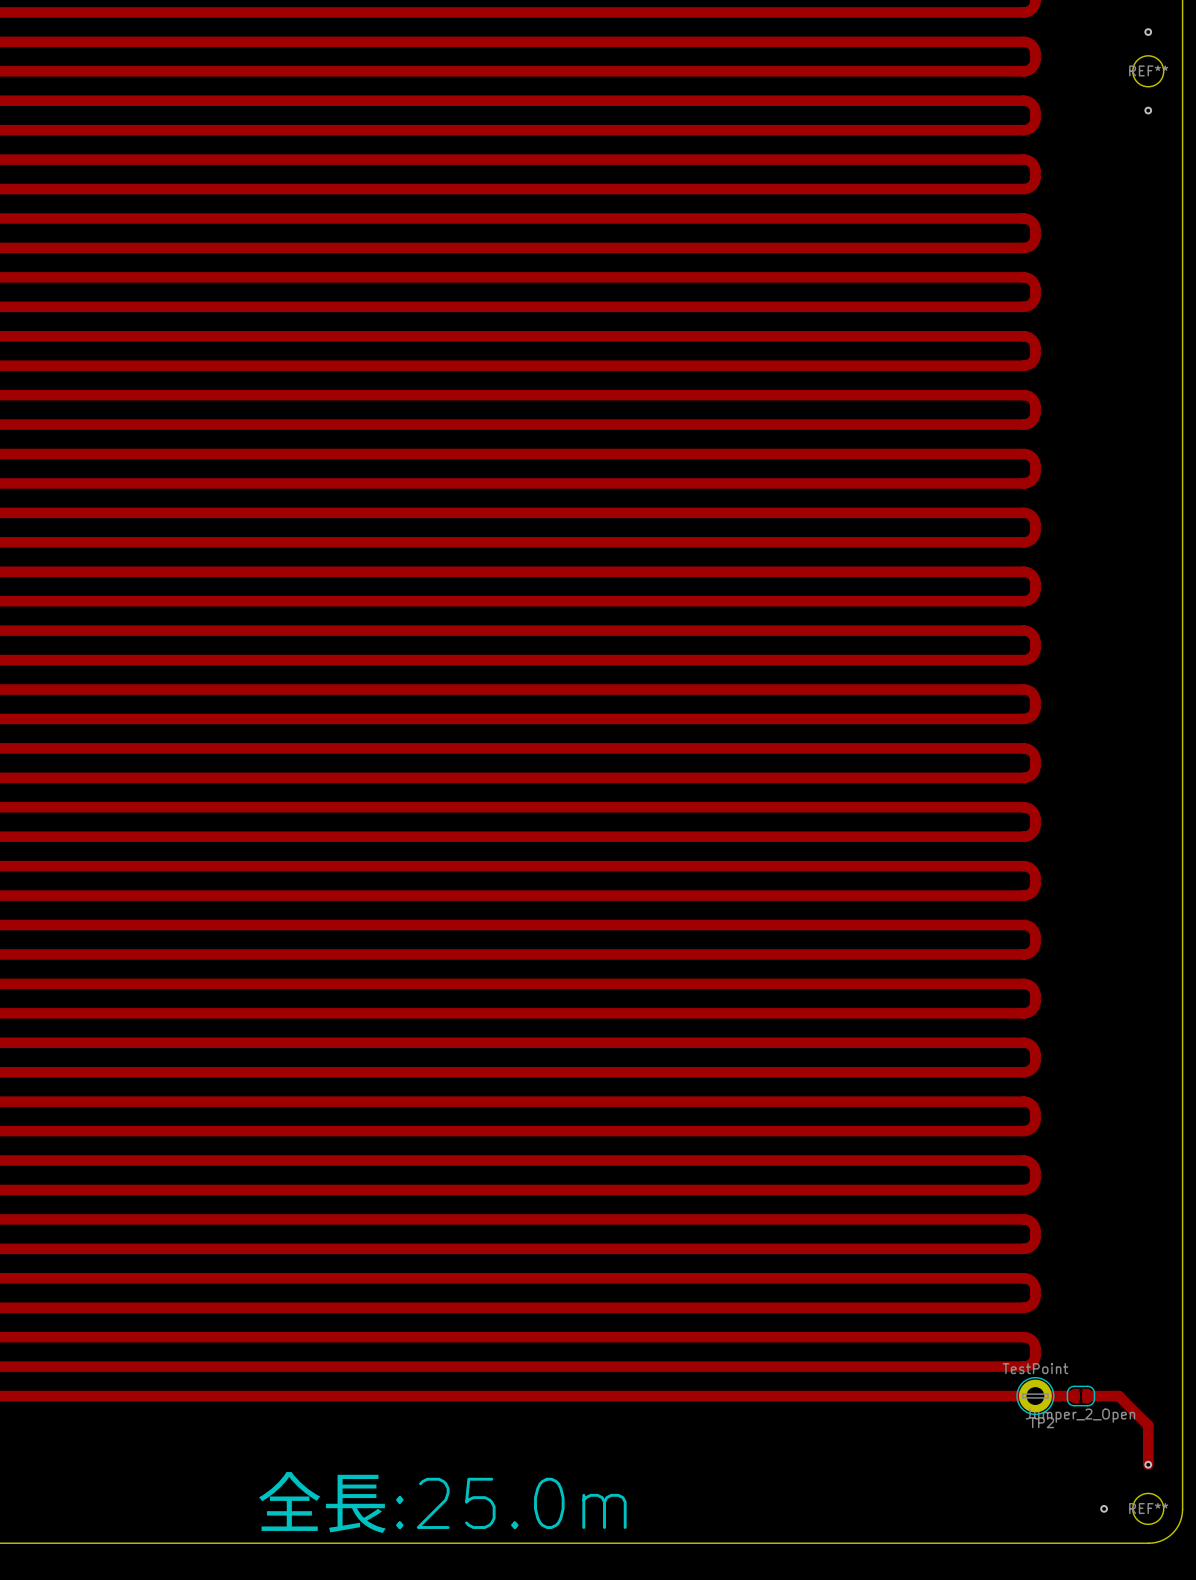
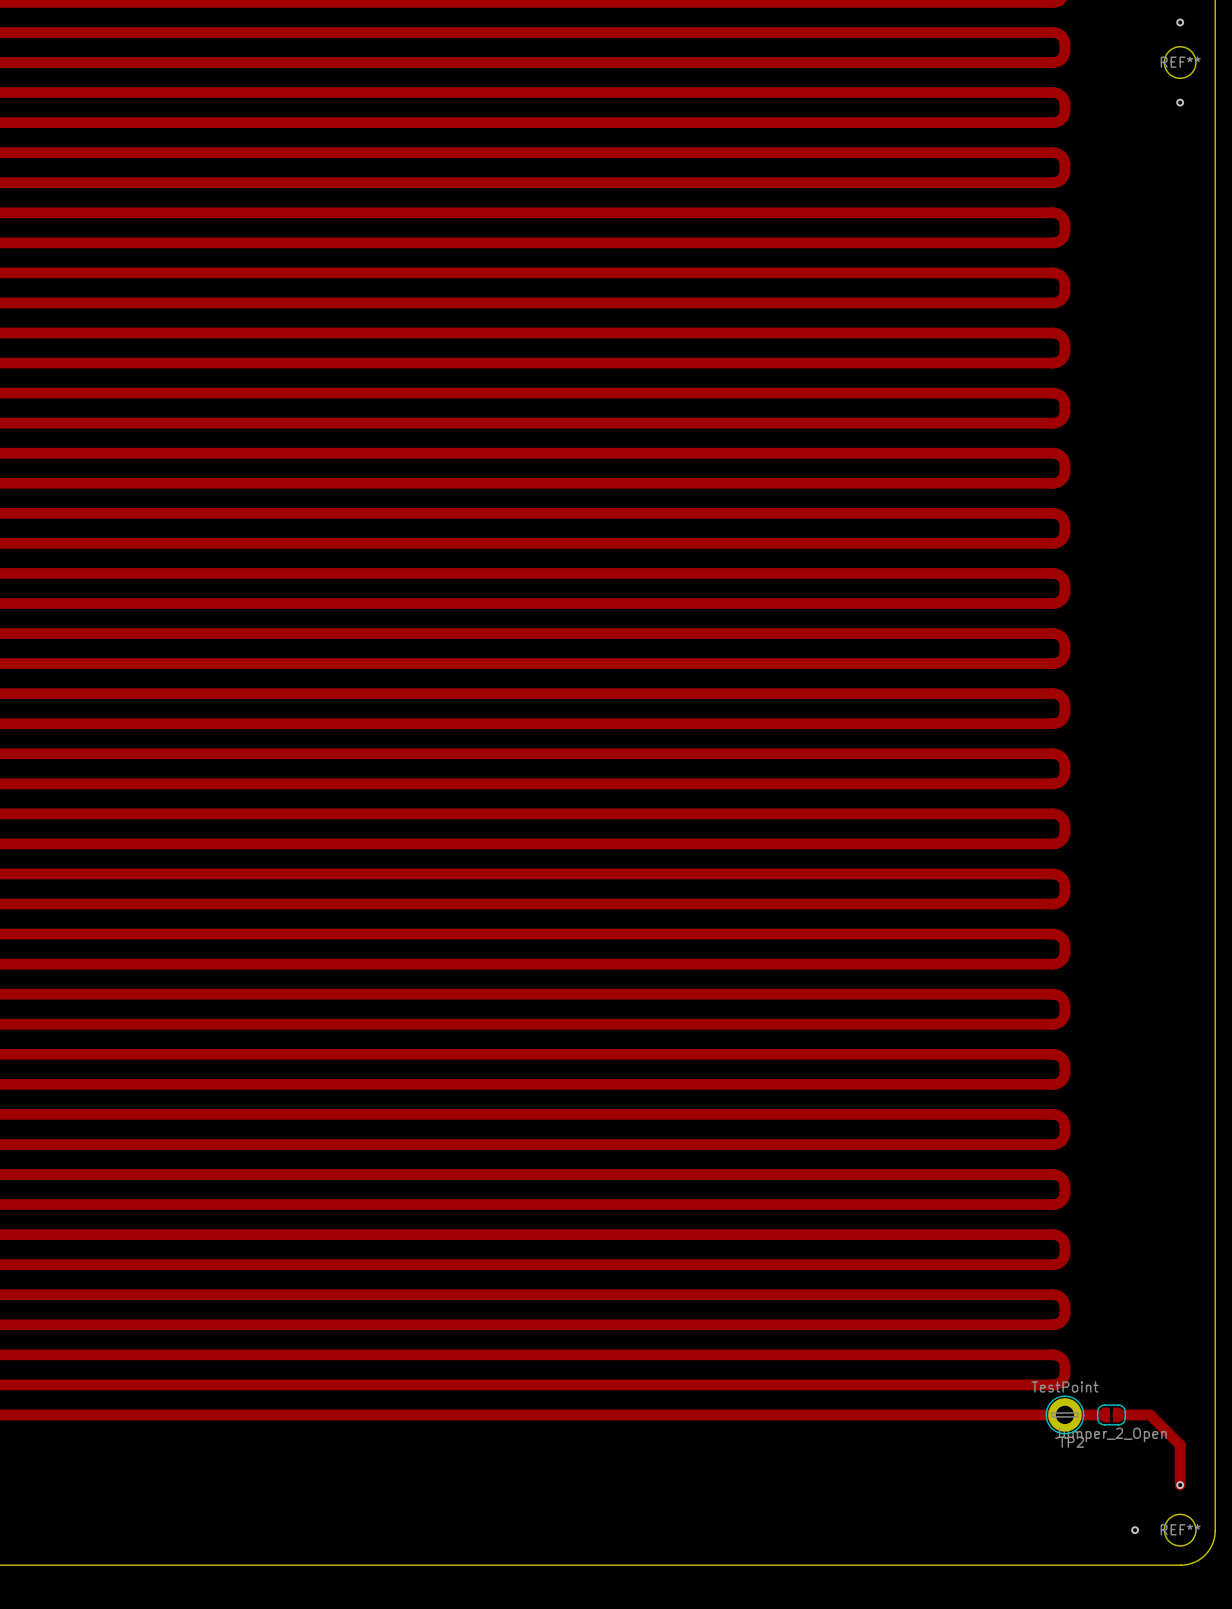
text: 全長:25.0m (442, 1502) -> none

